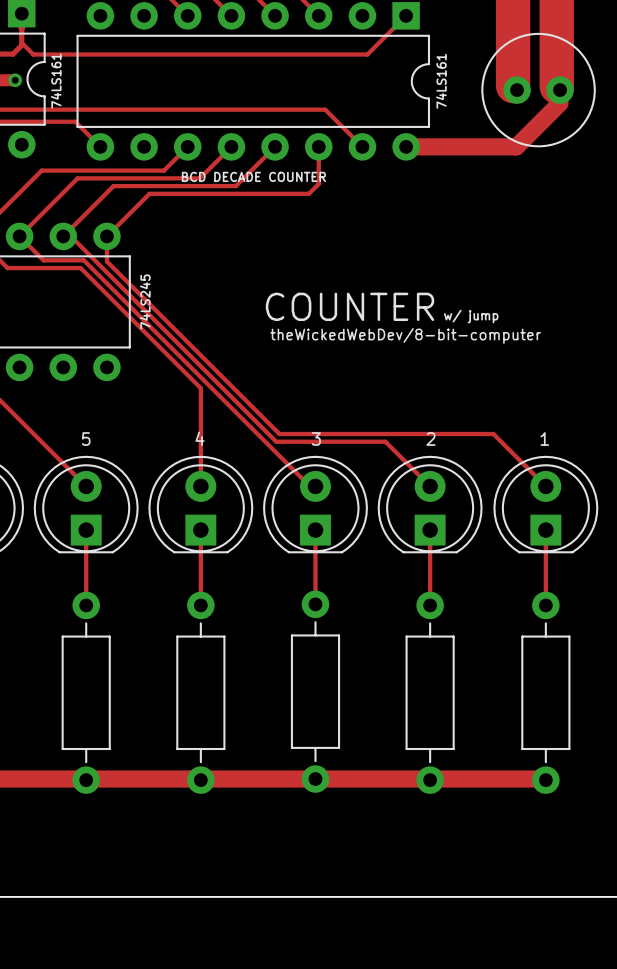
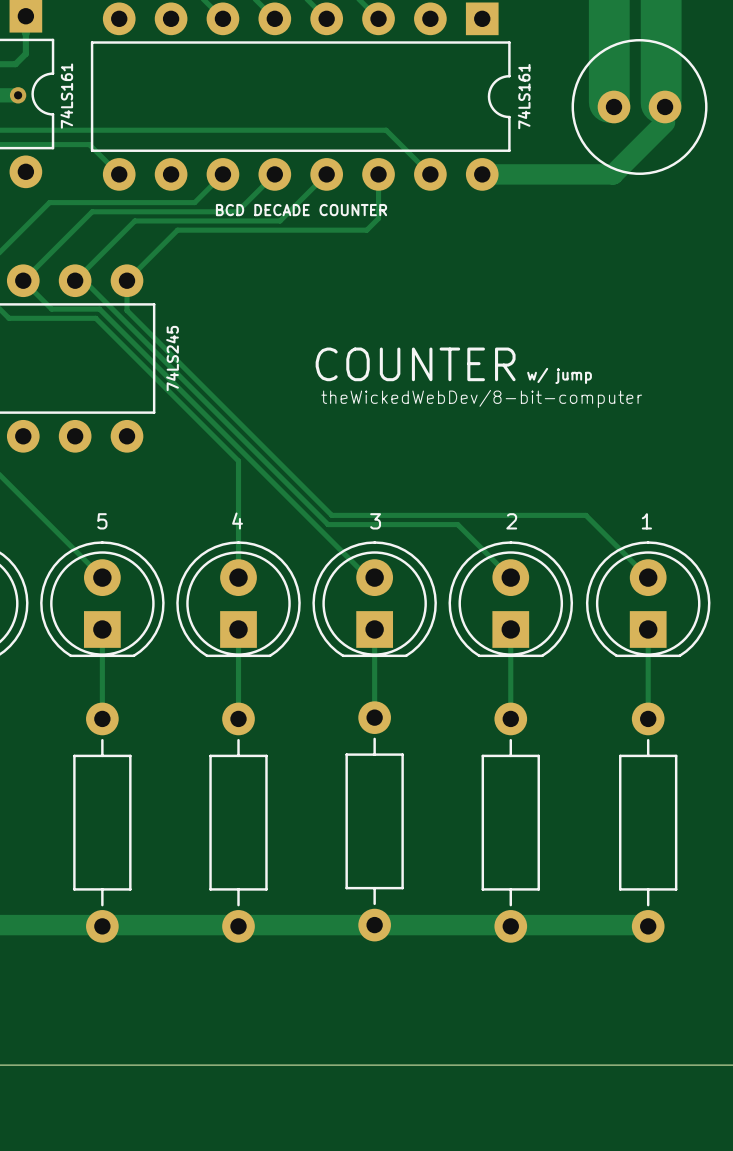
track: (21, 13) (21, 42) (33, 54) (367, 54) (406, 15) -> none

